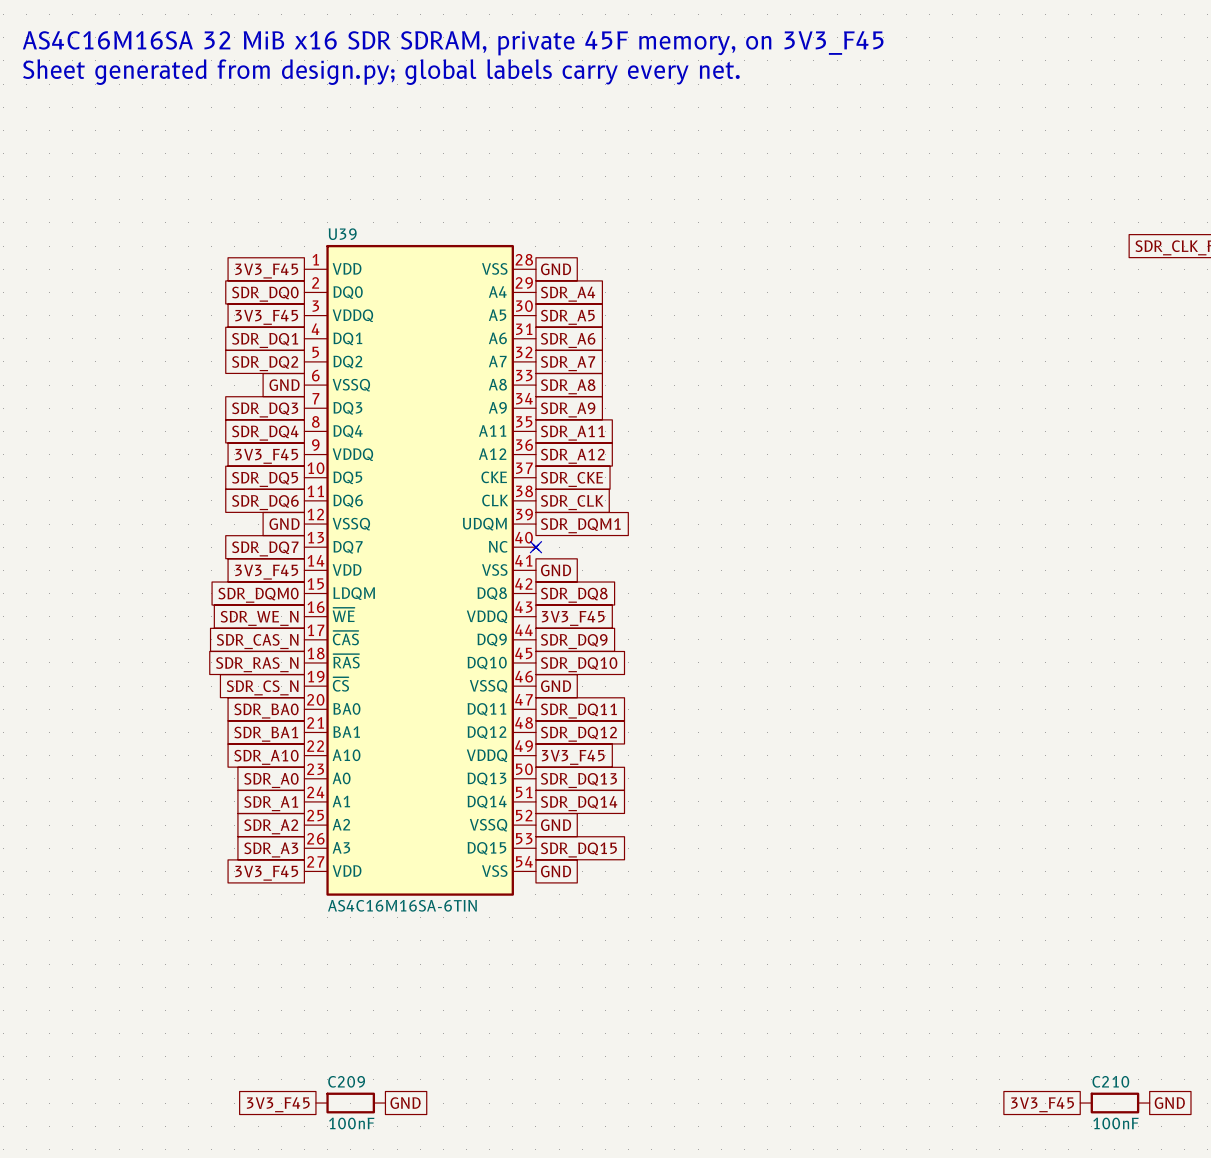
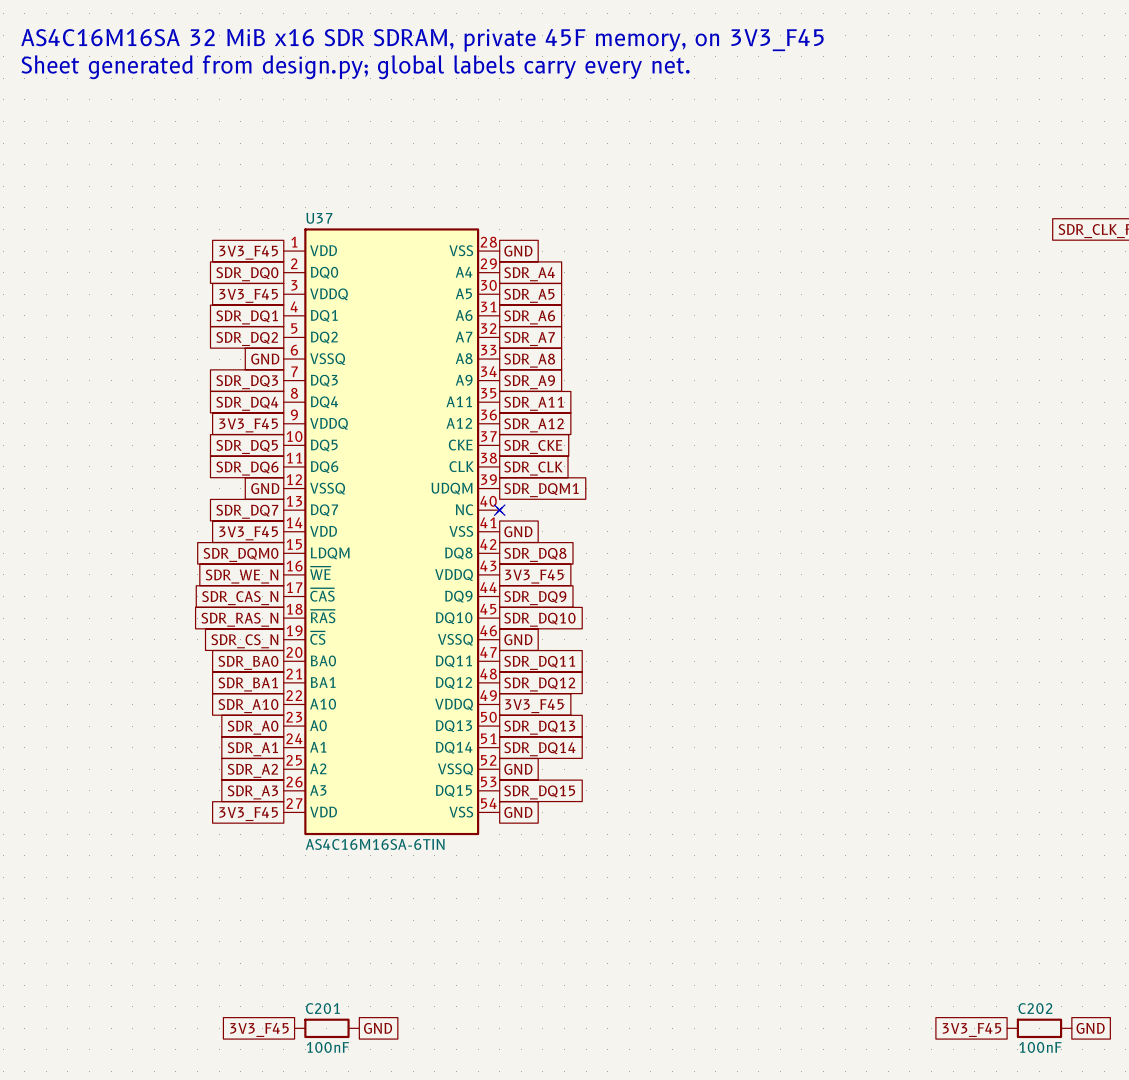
U39 name: U39 (342, 234) -> U37 (319, 218)
C209 name: C209 (346, 1081) -> C201 (322, 1008)
C210 name: C210 (1110, 1081) -> C202 (1035, 1008)

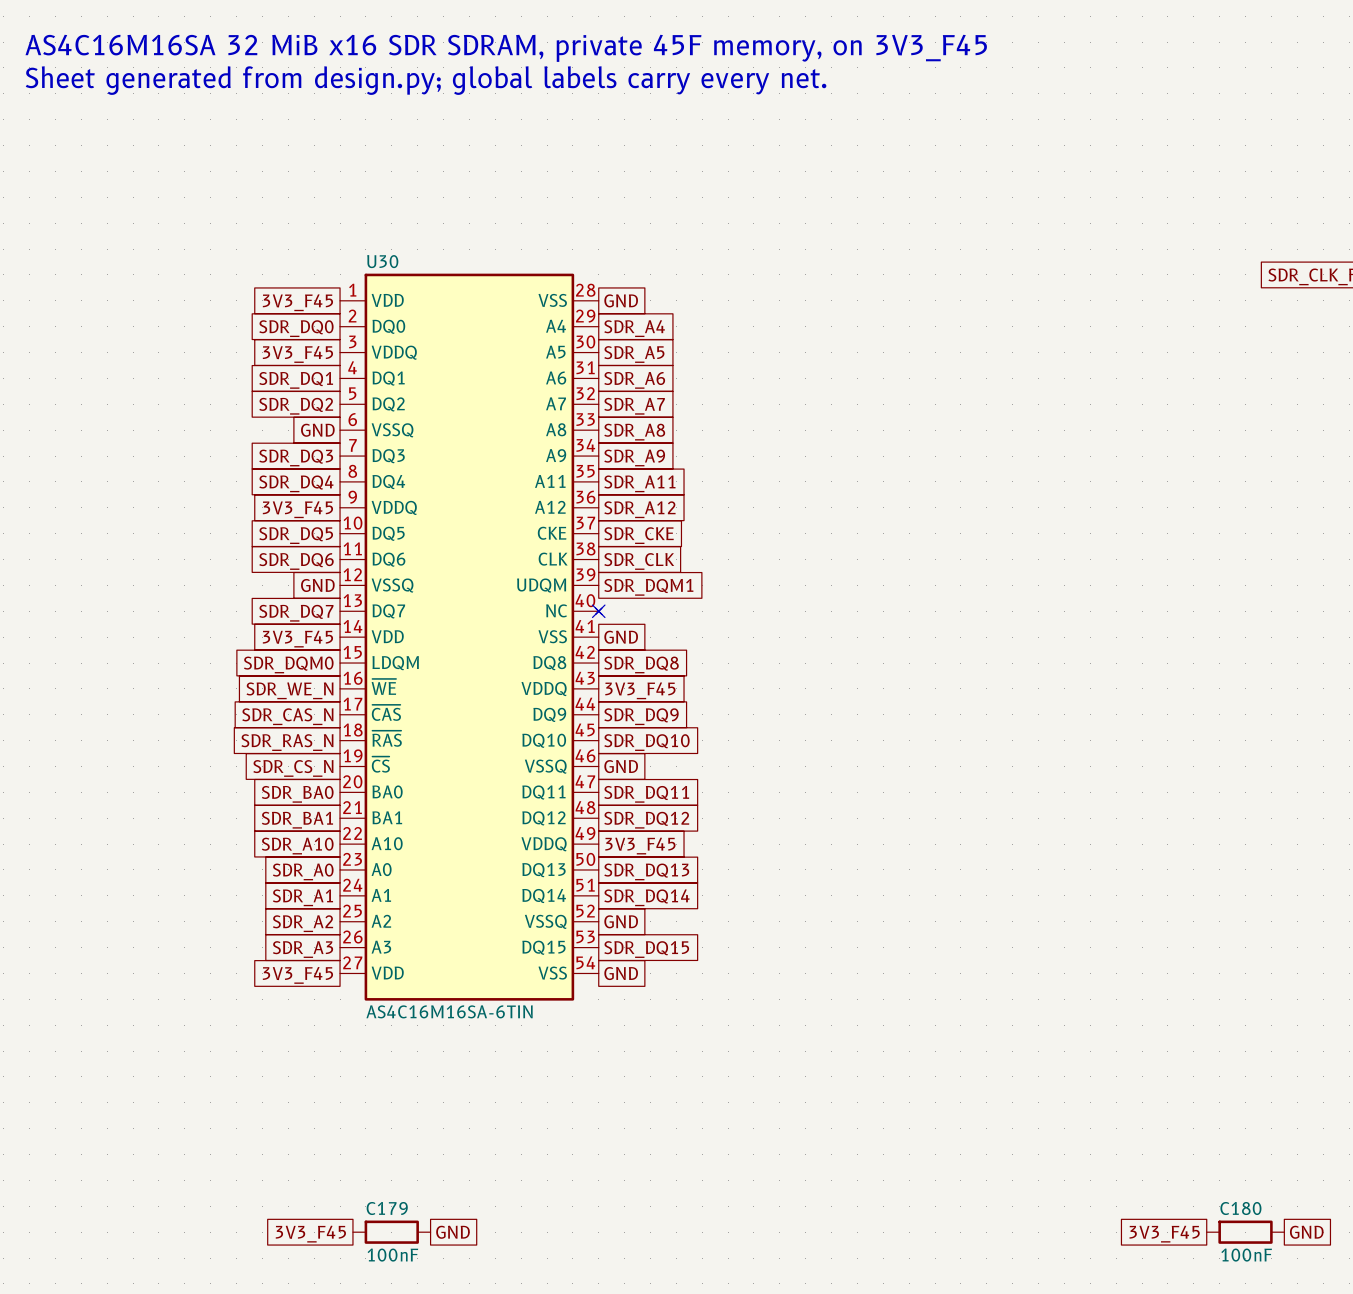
U37 name: U37 (319, 218) -> U30 (382, 261)
C201 name: C201 (322, 1008) -> C179 (387, 1208)
C202 name: C202 (1035, 1008) -> C180 (1240, 1208)

